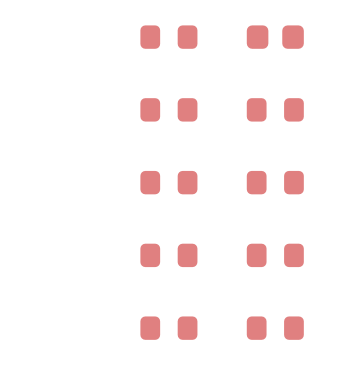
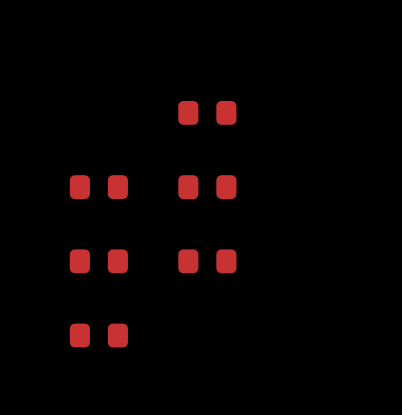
part: (168, 37) -> none
part: (275, 37) -> none
part: (168, 109) -> none
part: (275, 328) -> none

